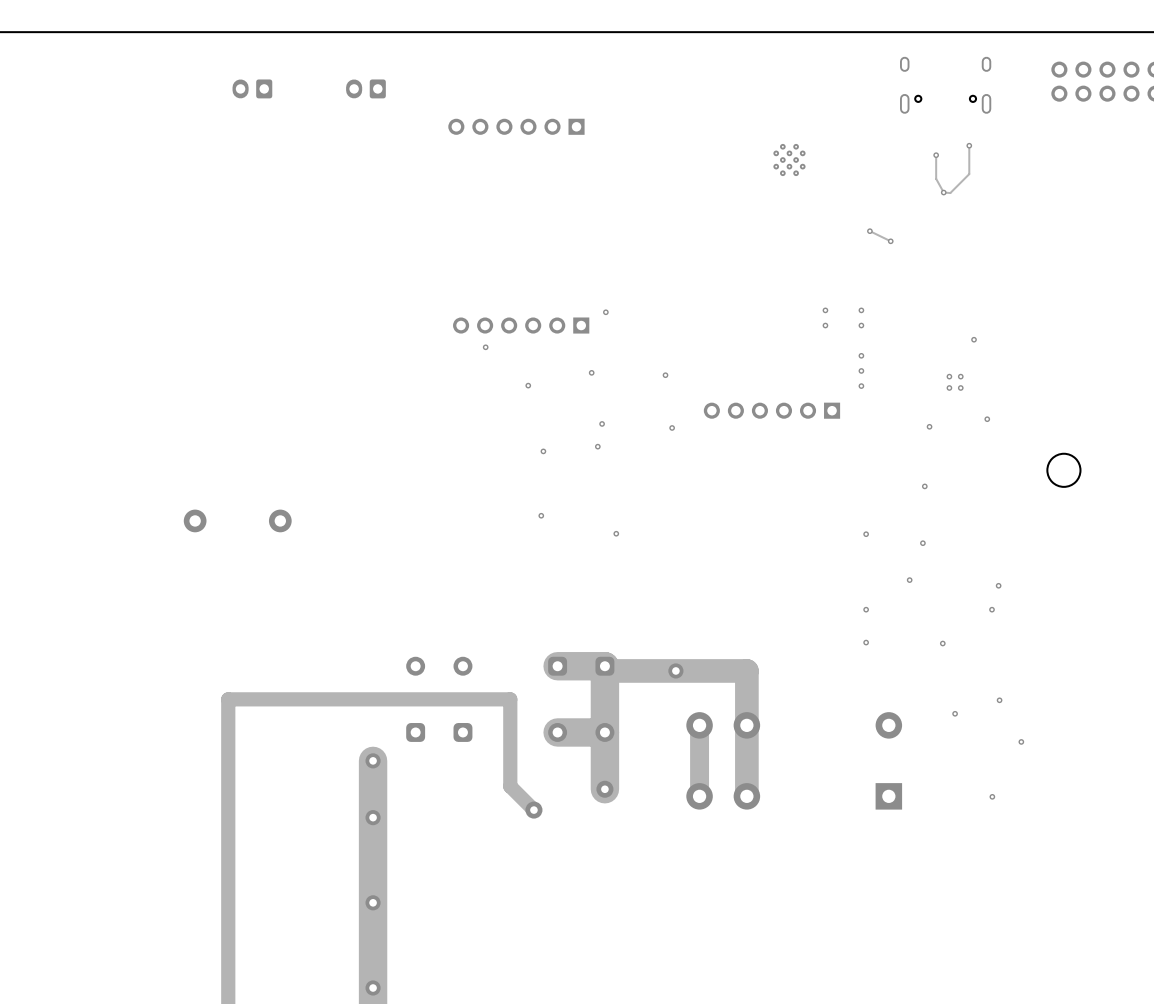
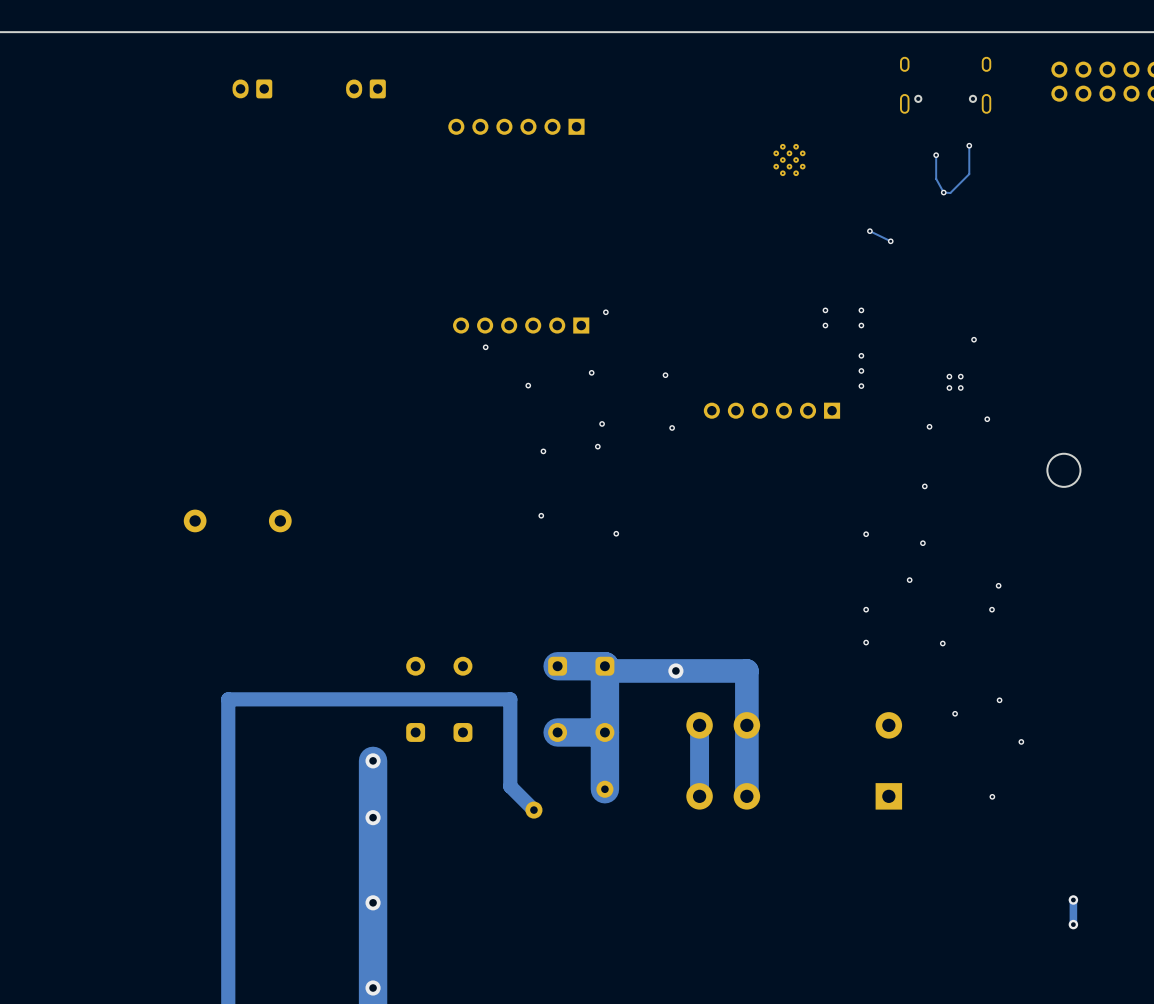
track: none -> (1073, 899) (1073, 924)
via: none -> (1073, 899)
via: none -> (1073, 924)

